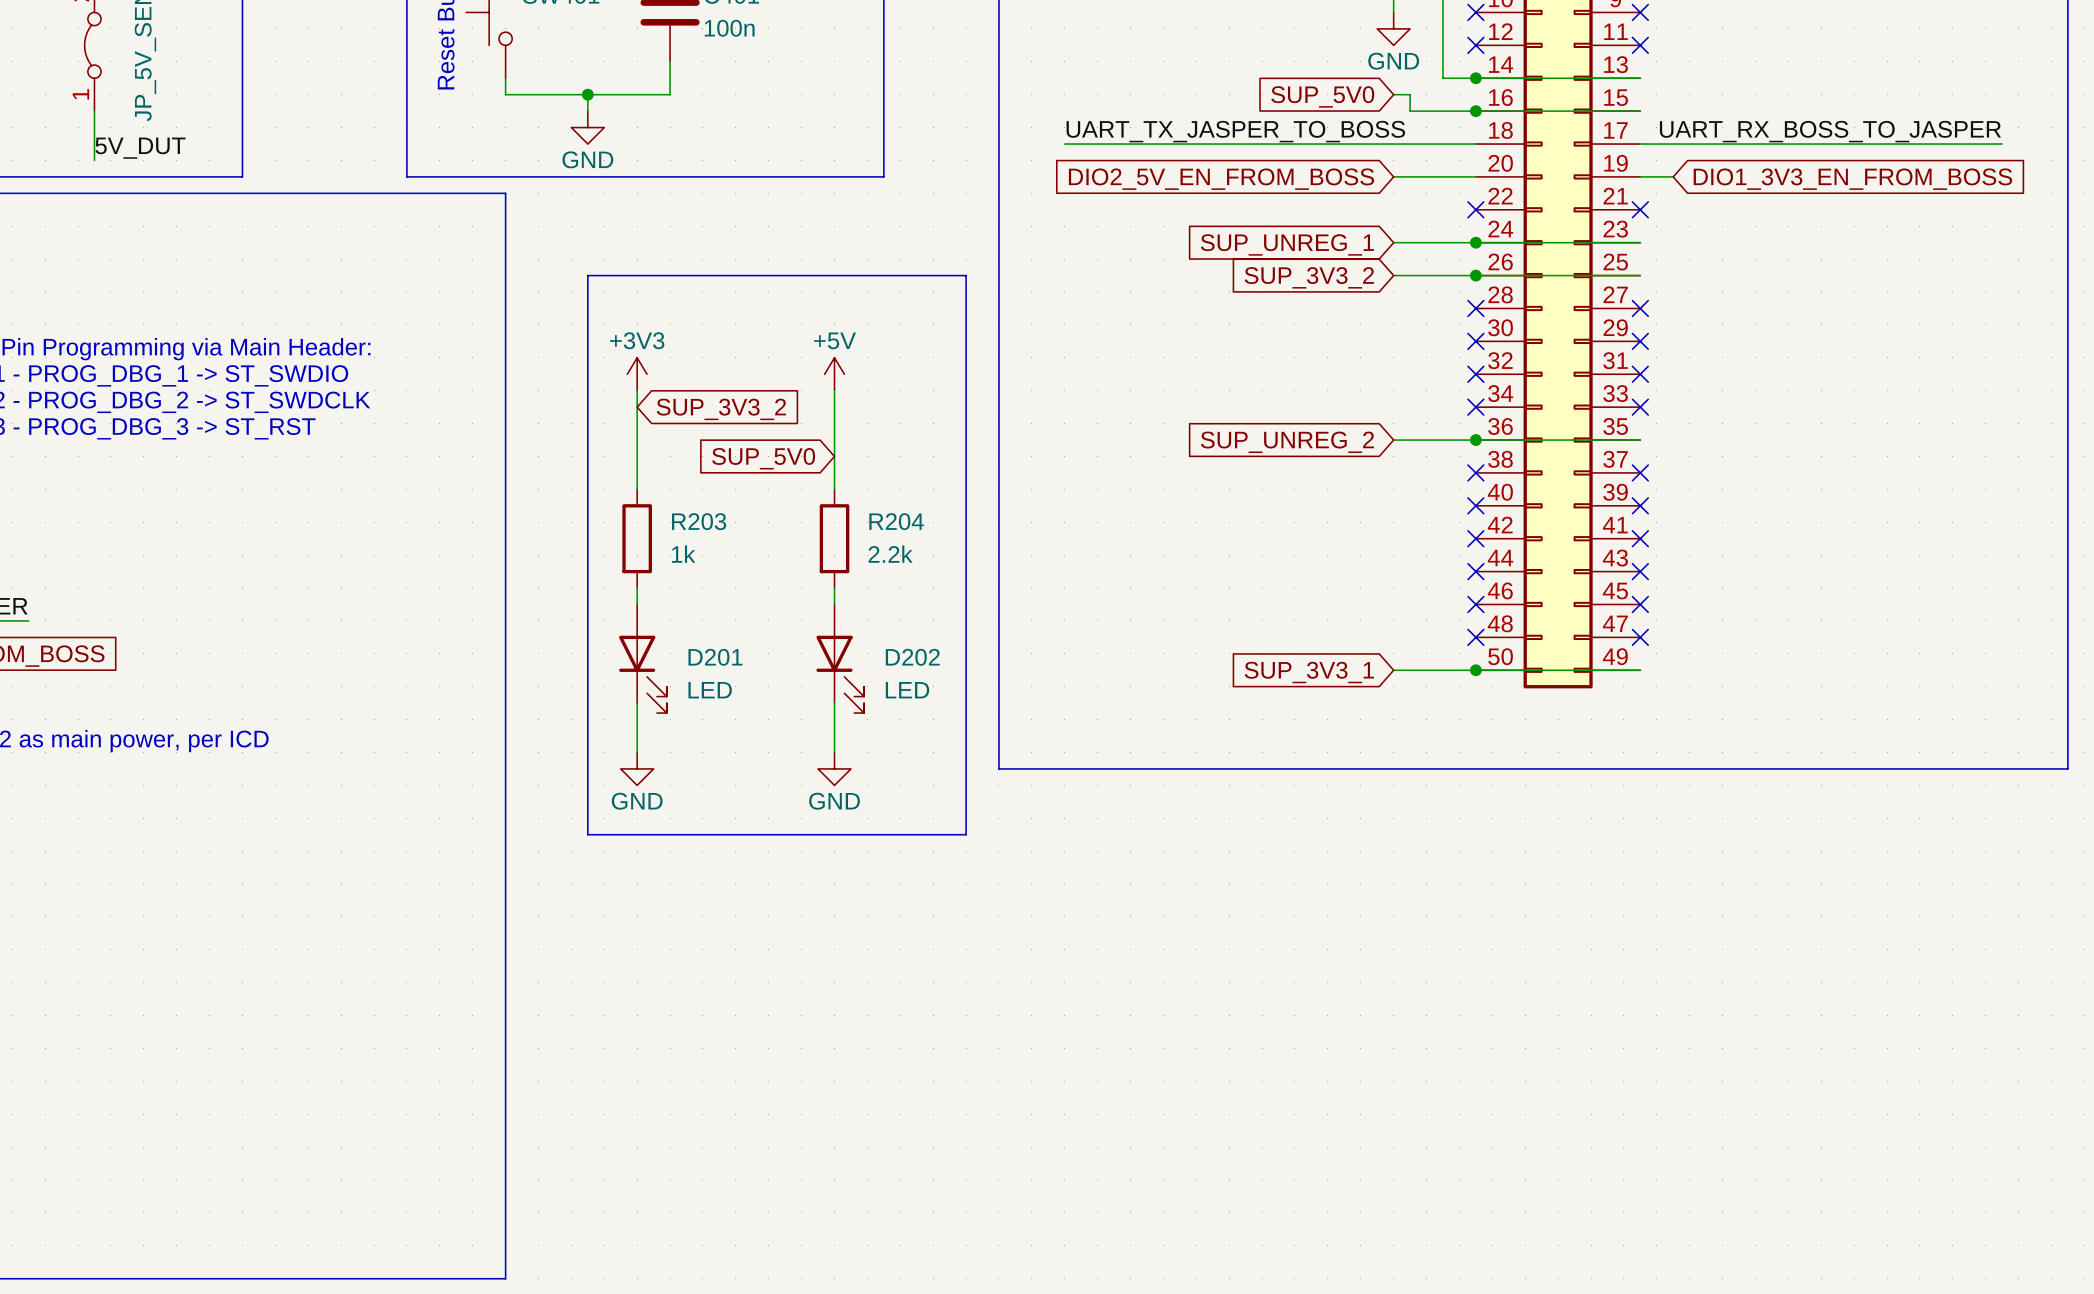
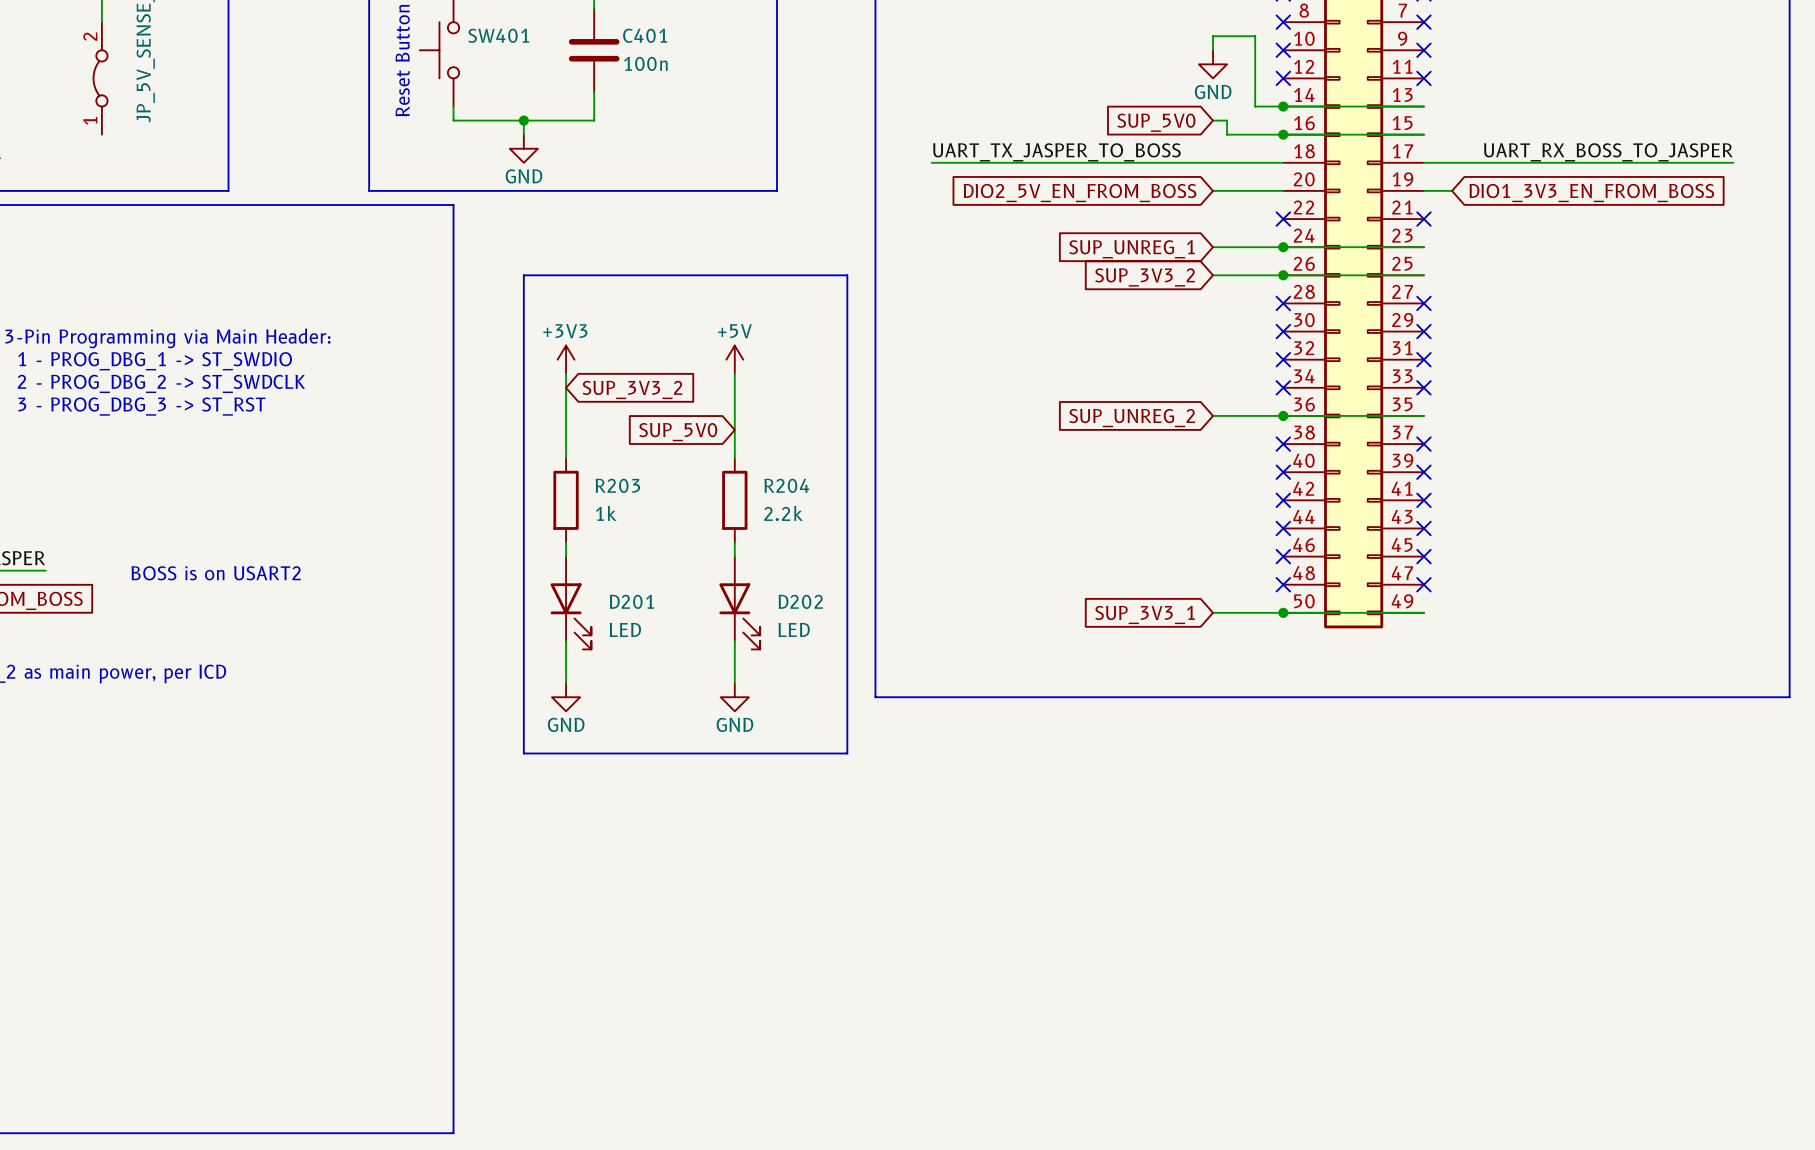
wire: (94, 111) (94, 160) -> none
label: 5V_DUT (140, 148) -> none
text: none -> BOSS is on USART2 (216, 573)

